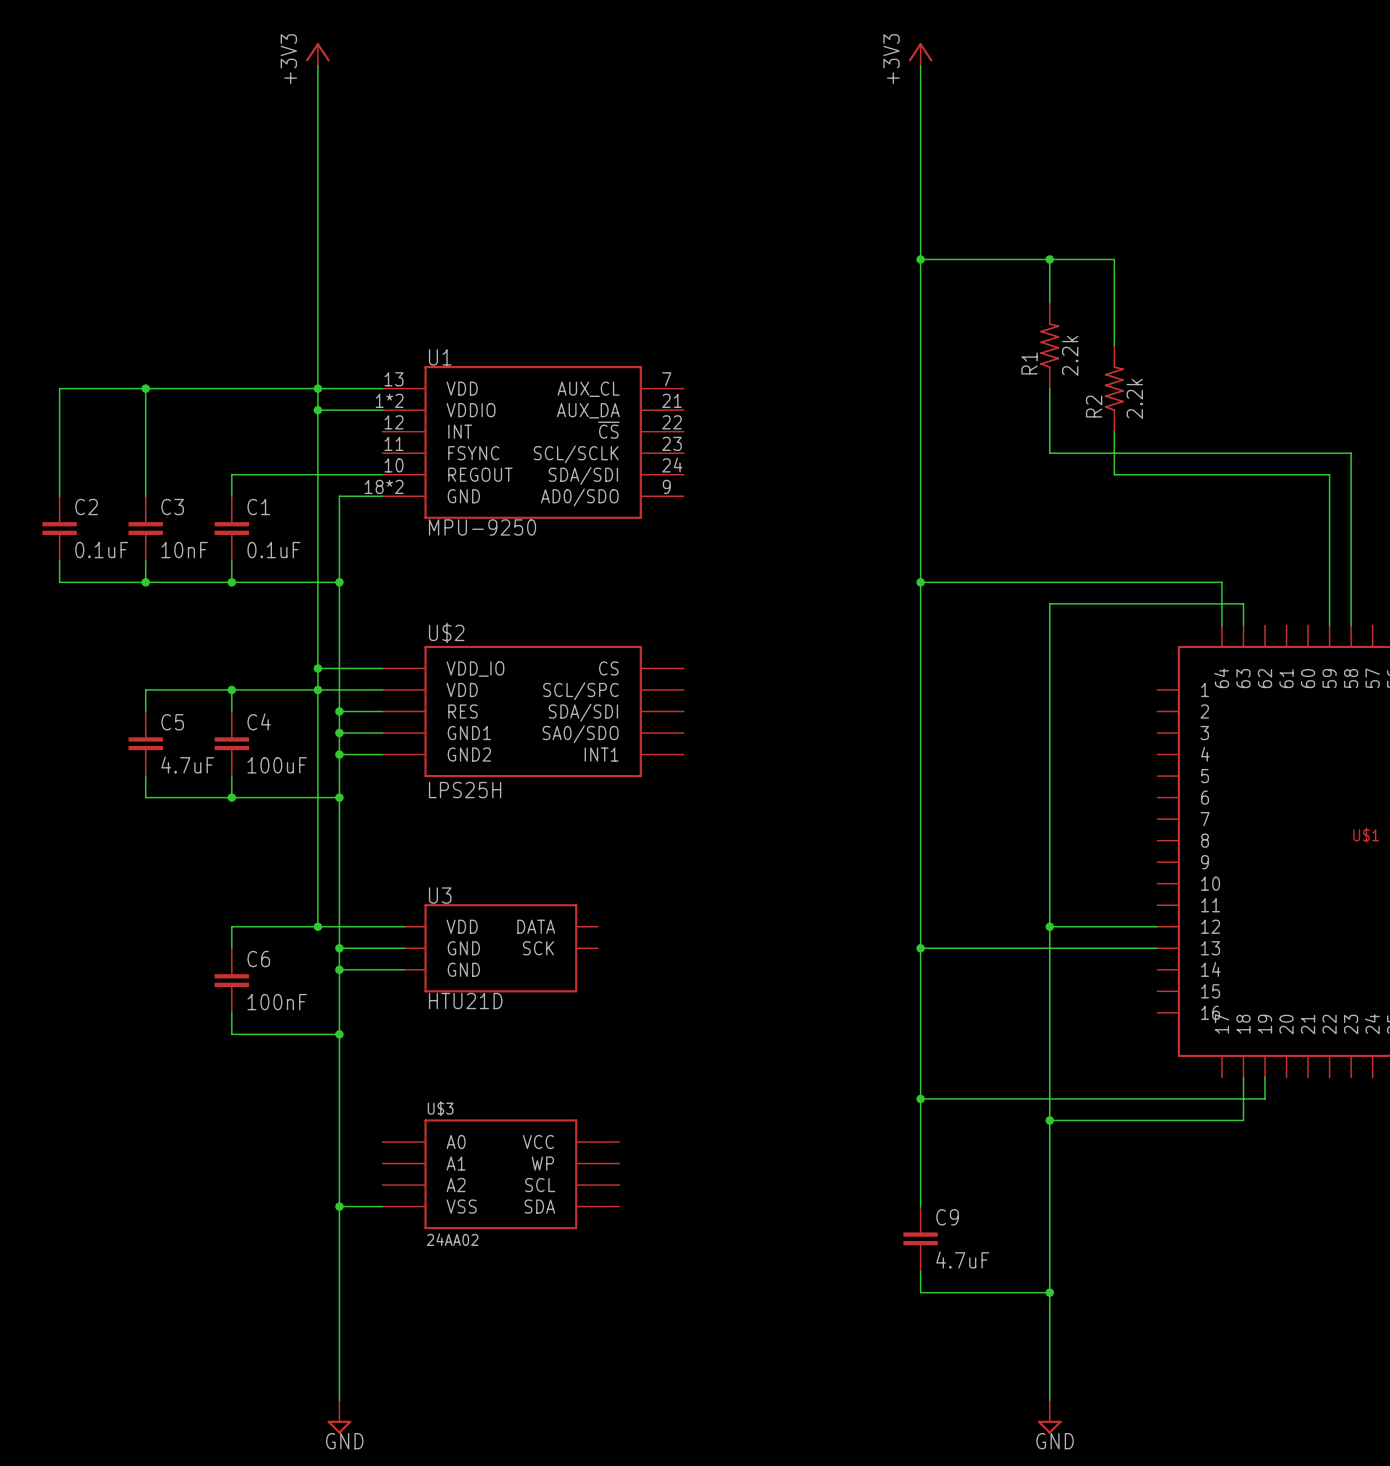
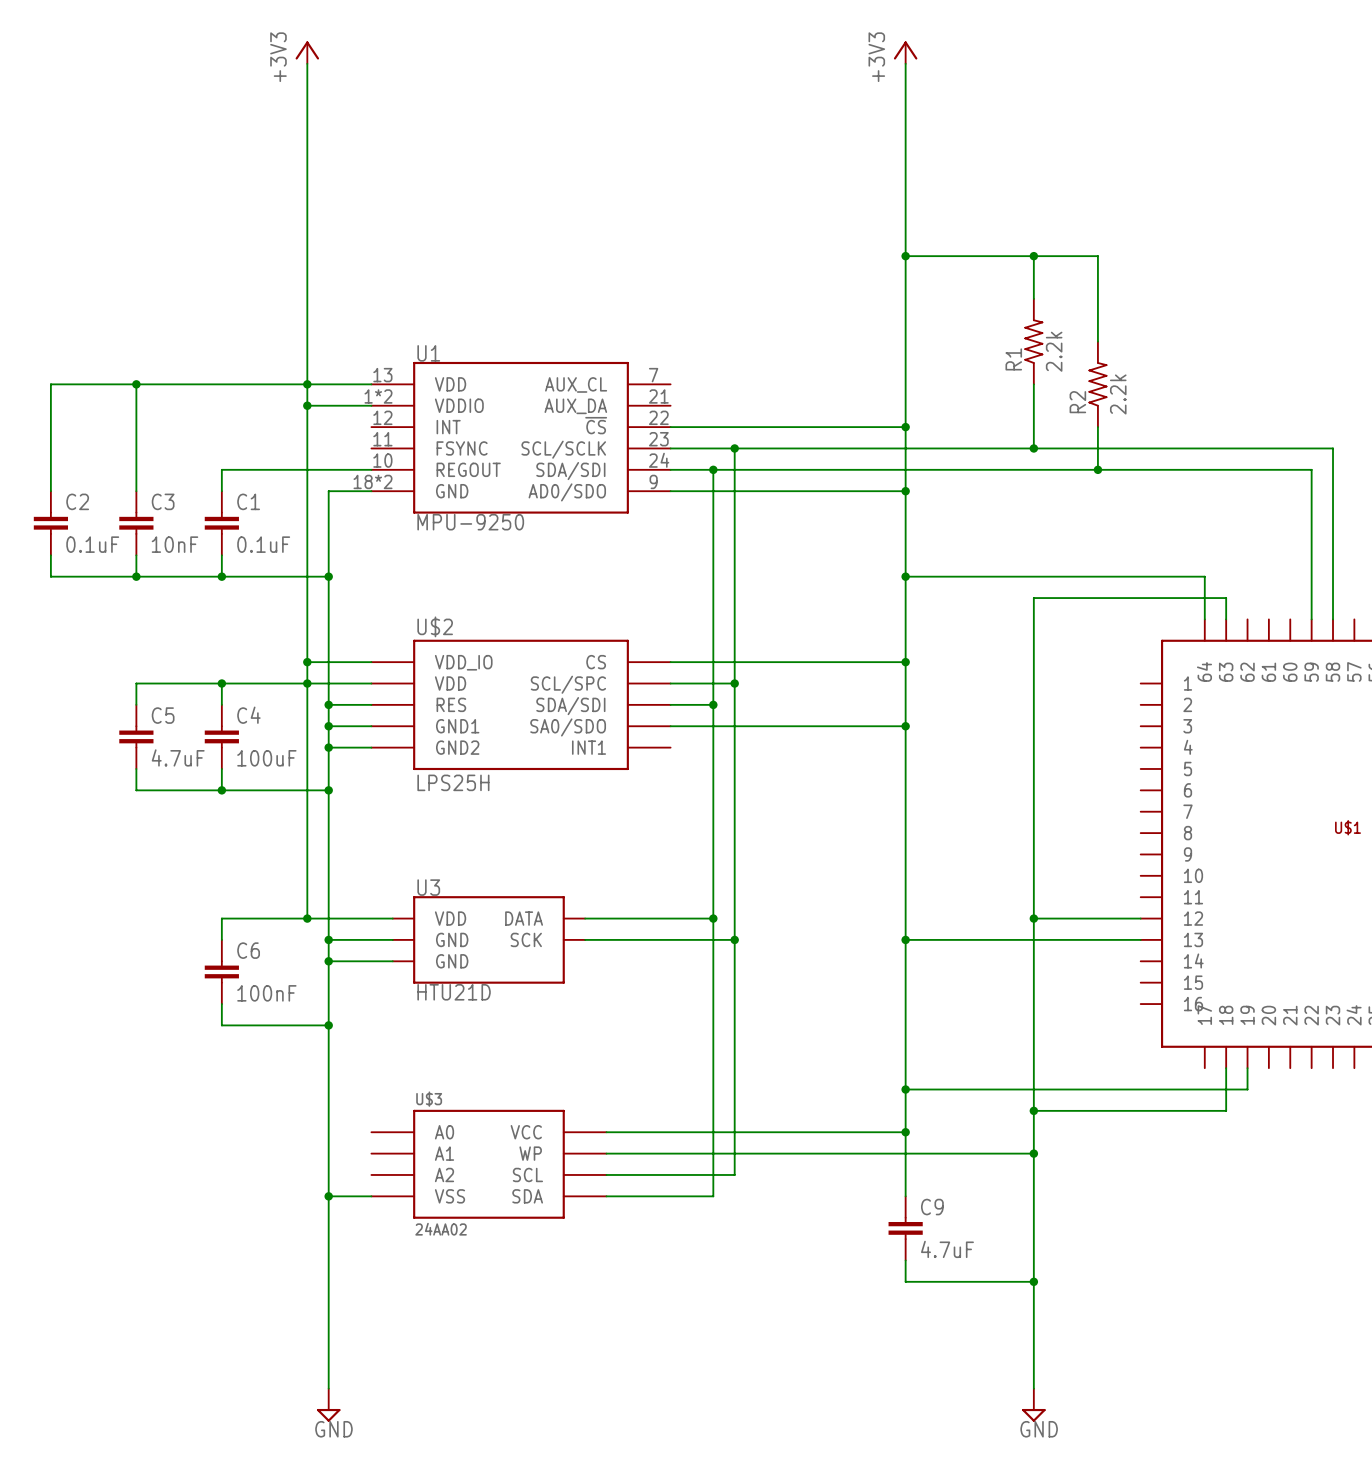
wire: none -> (670, 427) (905, 427)
junction: none -> (905, 427)
wire: none -> (670, 448) (1033, 448)
wire: none -> (734, 448) (734, 1174) (606, 1174)
junction: none -> (734, 448)
junction: none -> (1033, 448)
wire: none -> (670, 469) (1097, 469)
wire: none -> (713, 469) (713, 1196) (606, 1196)
junction: none -> (713, 469)
junction: none -> (1097, 469)
wire: none -> (670, 491) (905, 491)
junction: none -> (905, 491)
wire: none -> (670, 662) (905, 662)
junction: none -> (905, 662)
wire: none -> (670, 683) (734, 683)
junction: none -> (734, 683)
wire: none -> (670, 704) (713, 704)
junction: none -> (713, 704)
wire: none -> (670, 726) (905, 726)
junction: none -> (905, 726)
wire: none -> (585, 918) (713, 918)
junction: none -> (713, 918)
wire: none -> (585, 939) (734, 939)
junction: none -> (734, 939)
wire: none -> (606, 1132) (905, 1132)
junction: none -> (905, 1132)
wire: none -> (606, 1153) (1033, 1153)
junction: none -> (1033, 1153)

